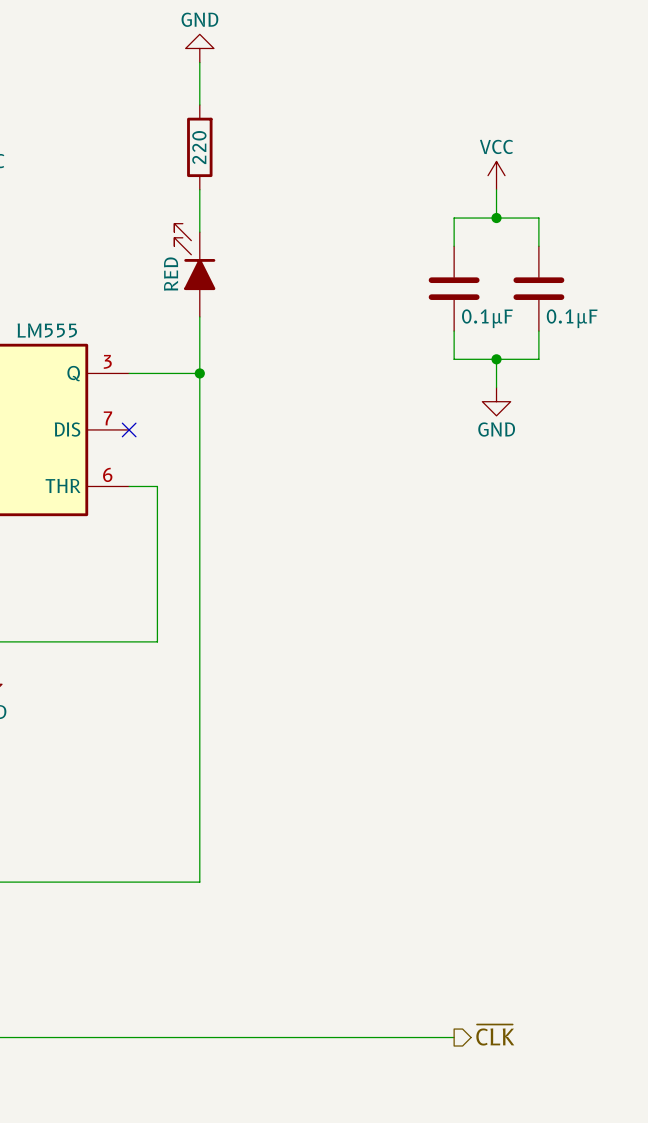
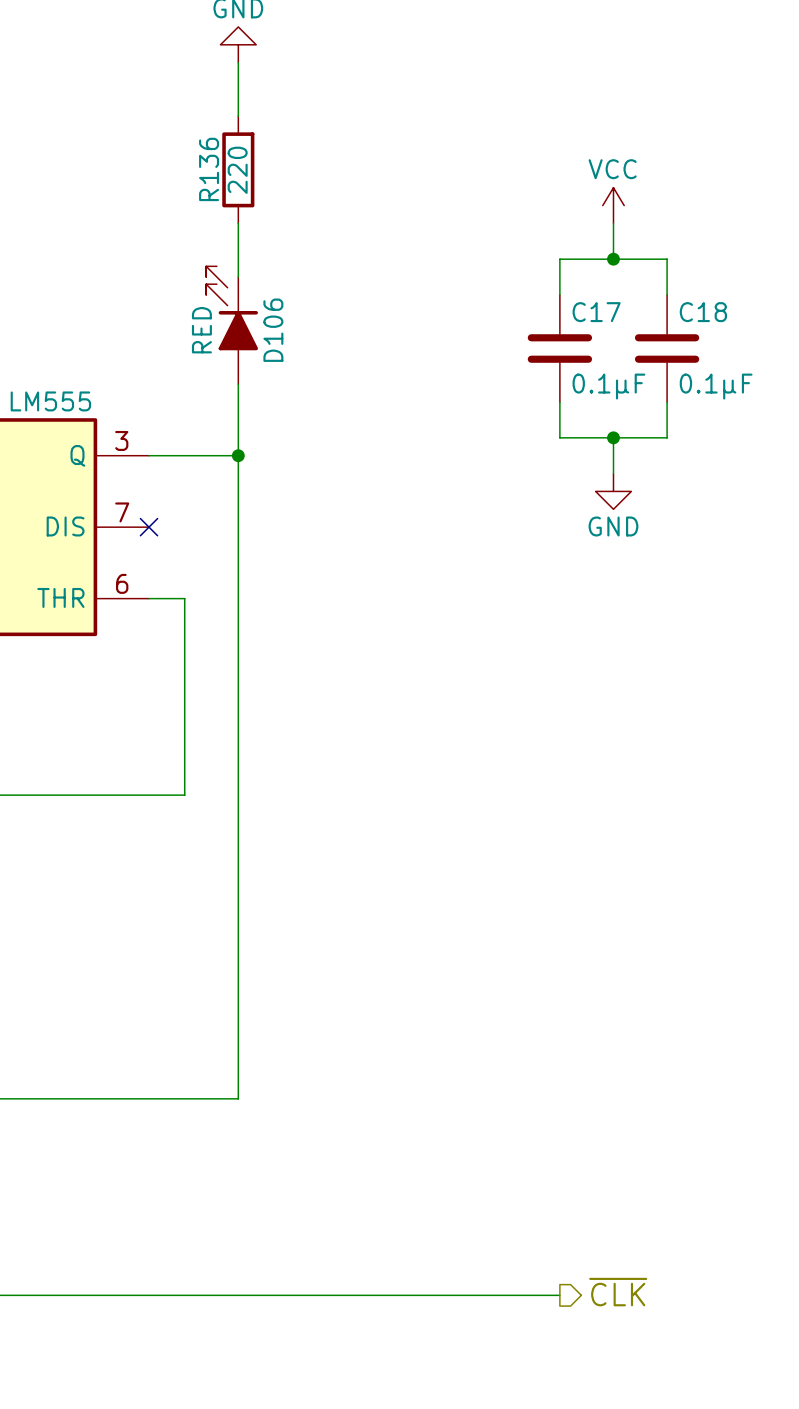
R136 name: none -> R136 (209, 169)
C17 name: none -> C17 (596, 312)
C18 name: none -> C18 (703, 312)
D106 name: none -> D106 (273, 330)

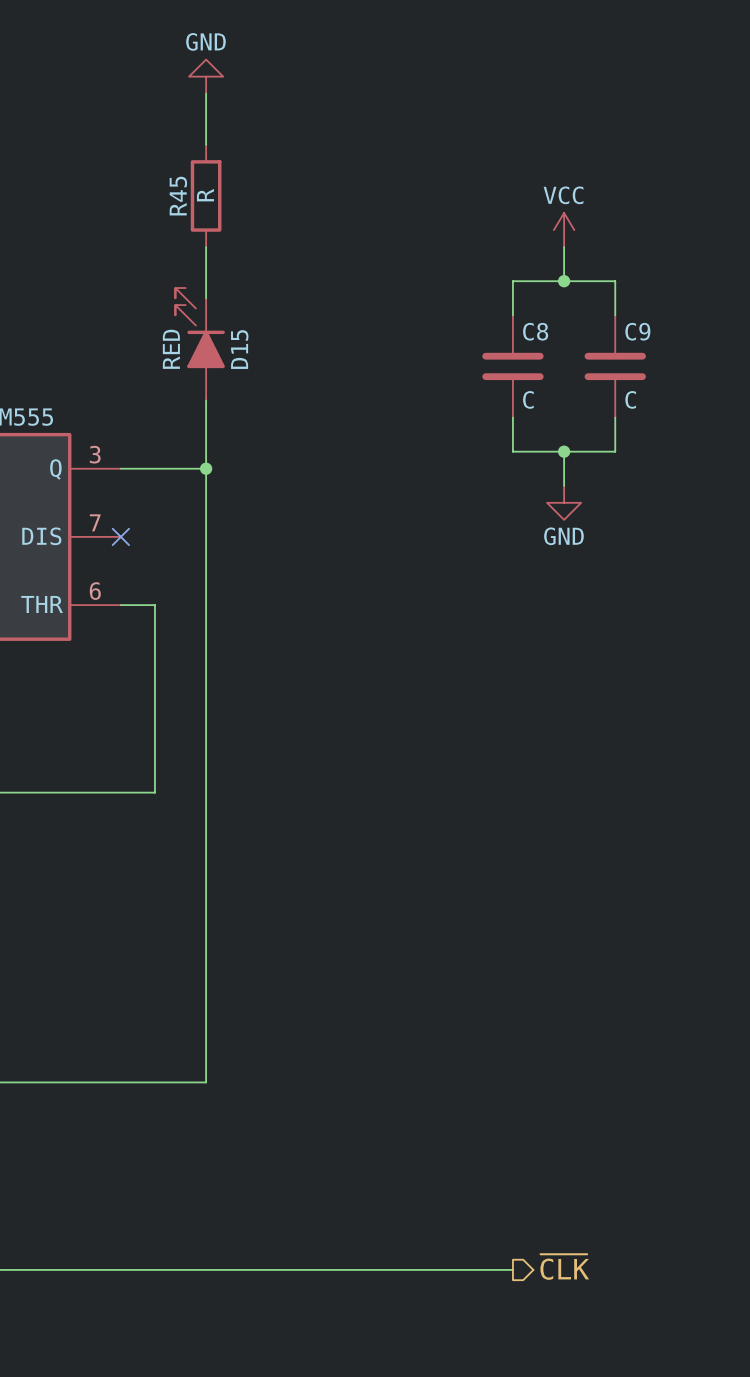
R136 name: R136 (209, 169) -> R45 (178, 196)
R136 value: 220 (237, 170) -> R (205, 195)
C17 name: C17 (596, 312) -> C8 (535, 331)
C18 name: C18 (703, 312) -> C9 (637, 331)
D106 name: D106 (273, 330) -> D15 (239, 349)
C17 value: 0.1µF (608, 386) -> C (528, 399)
C18 value: 0.1µF (716, 386) -> C (630, 399)

